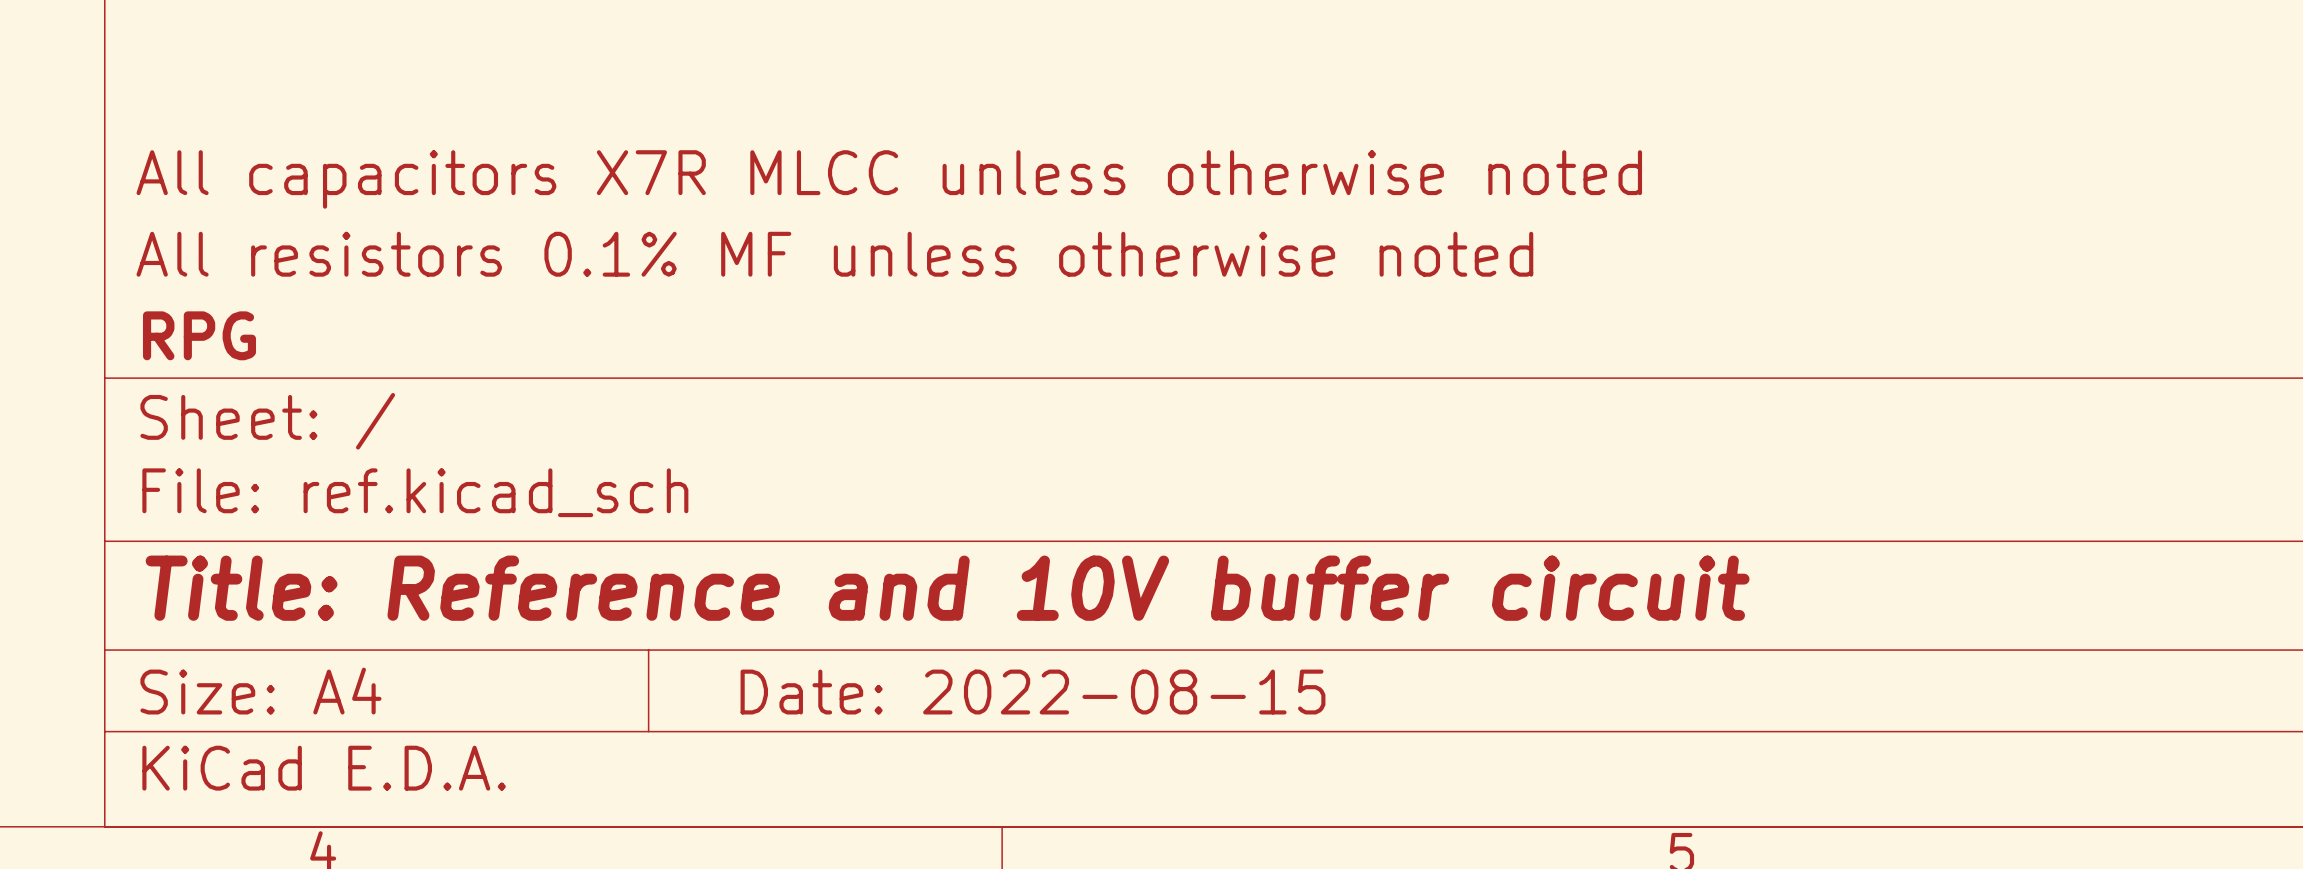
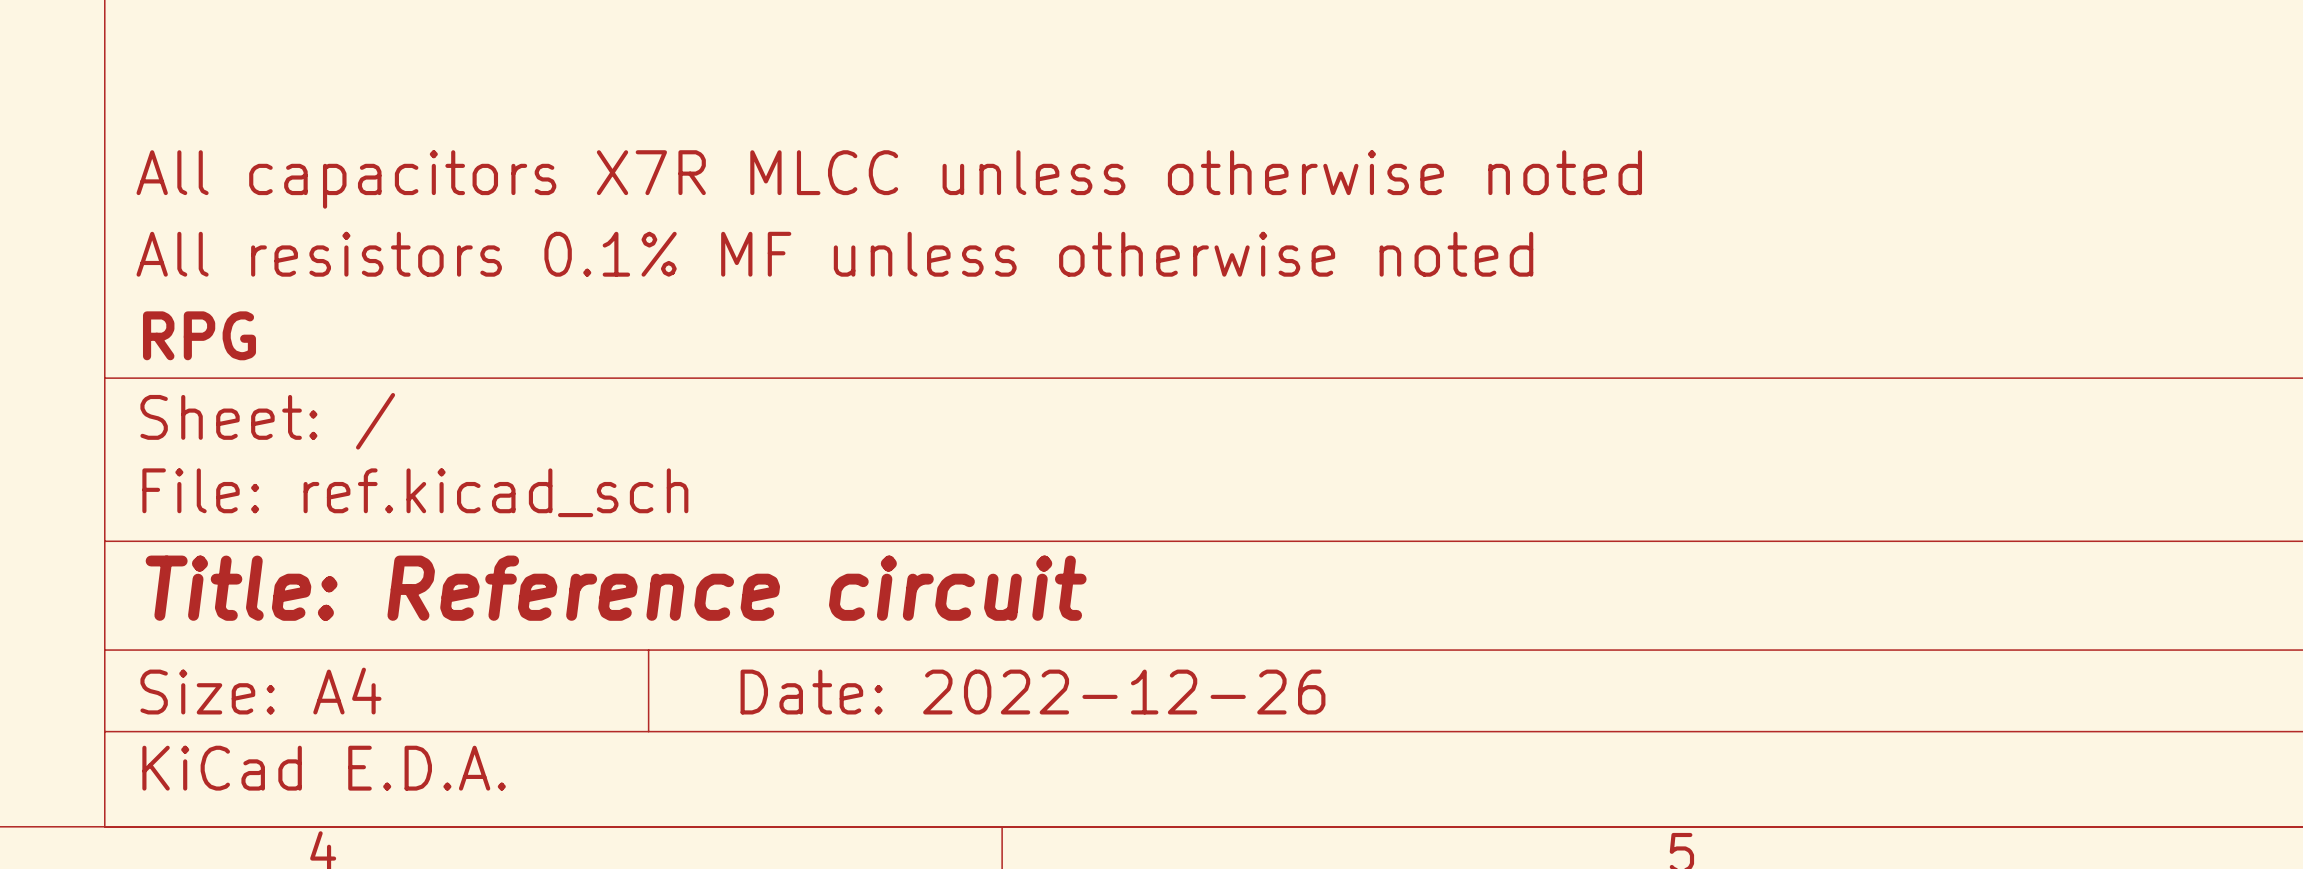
title block: Title: Reference and 10V buffer circuit (947, 588) -> Title: Reference circuit (616, 588)
title block: Date: 2022-08-15 (1033, 692) -> Date: 2022-12-26 (1033, 692)

